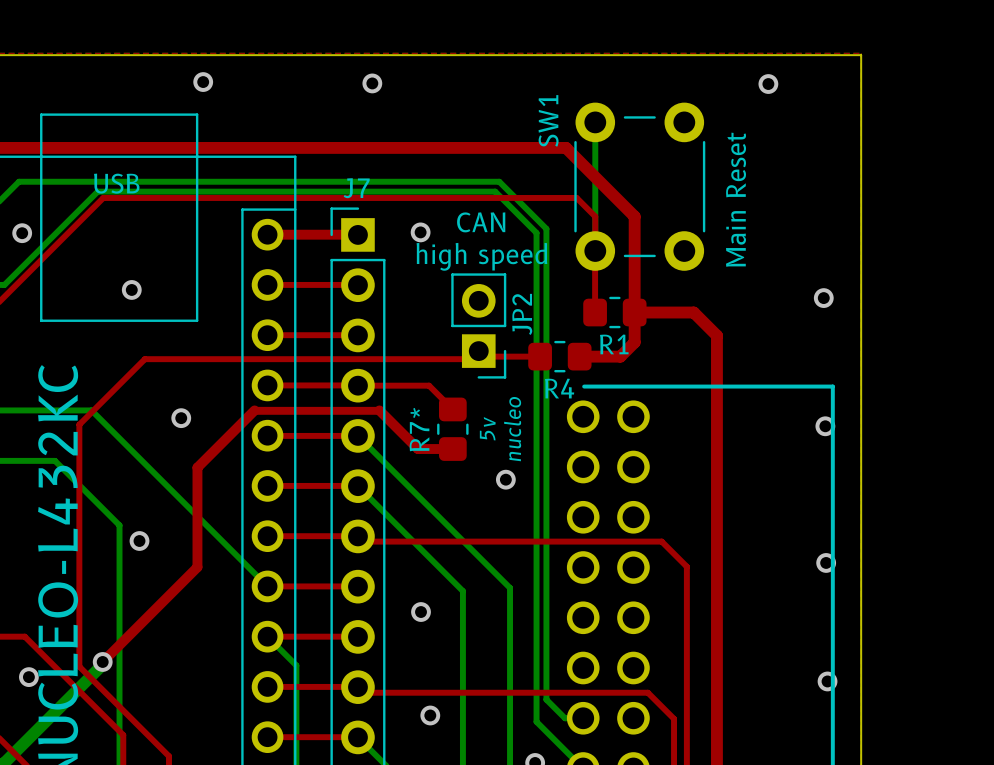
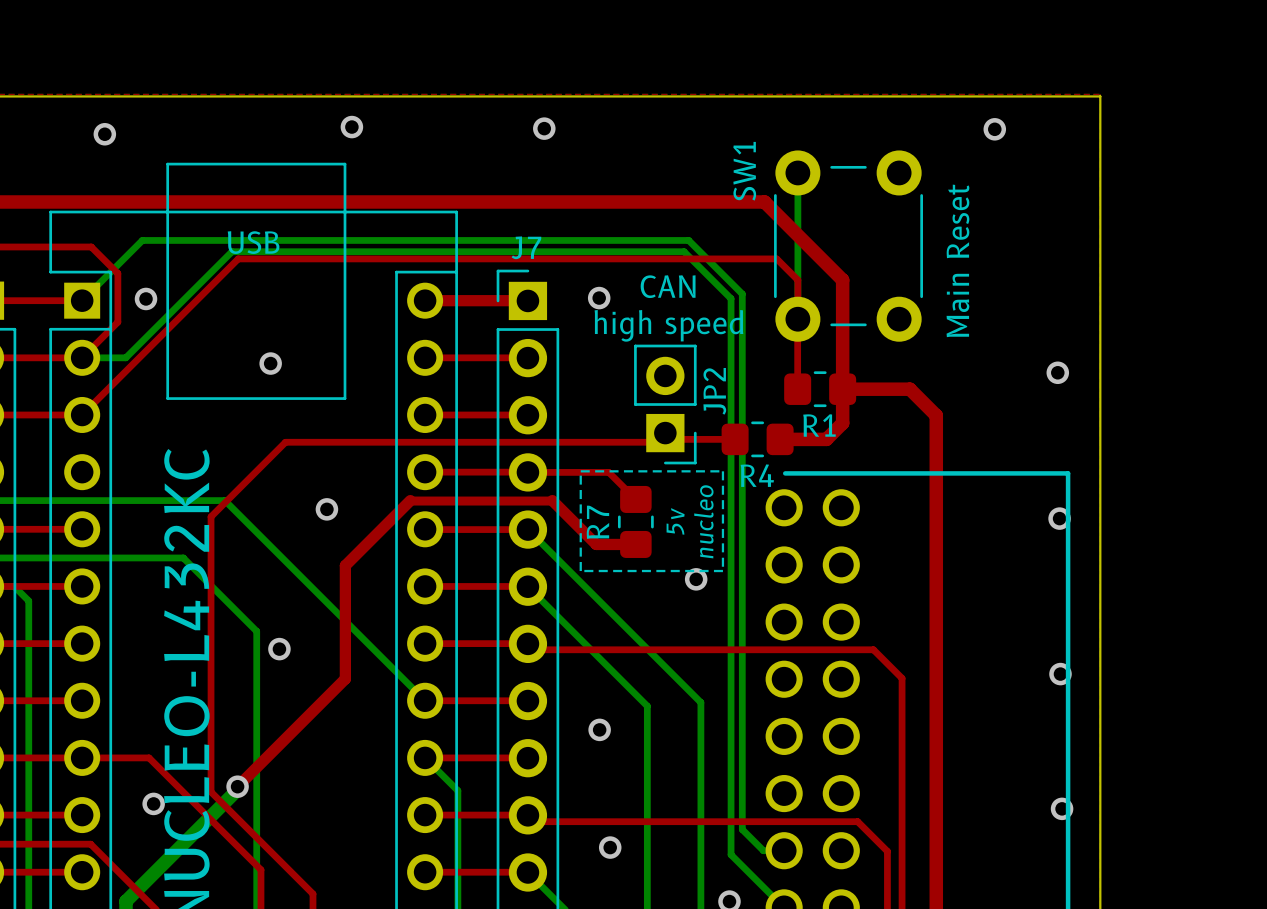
line: none -> (580, 471) (722, 471) (722, 571) (580, 571) (580, 471)
R7* name: R7* (419, 429) -> R7 (597, 522)

